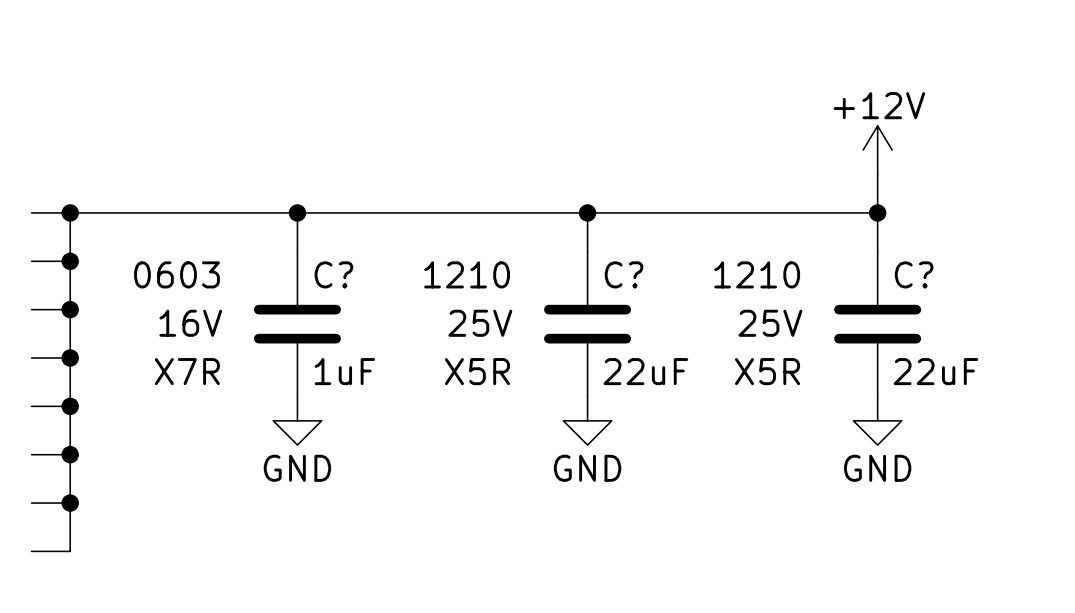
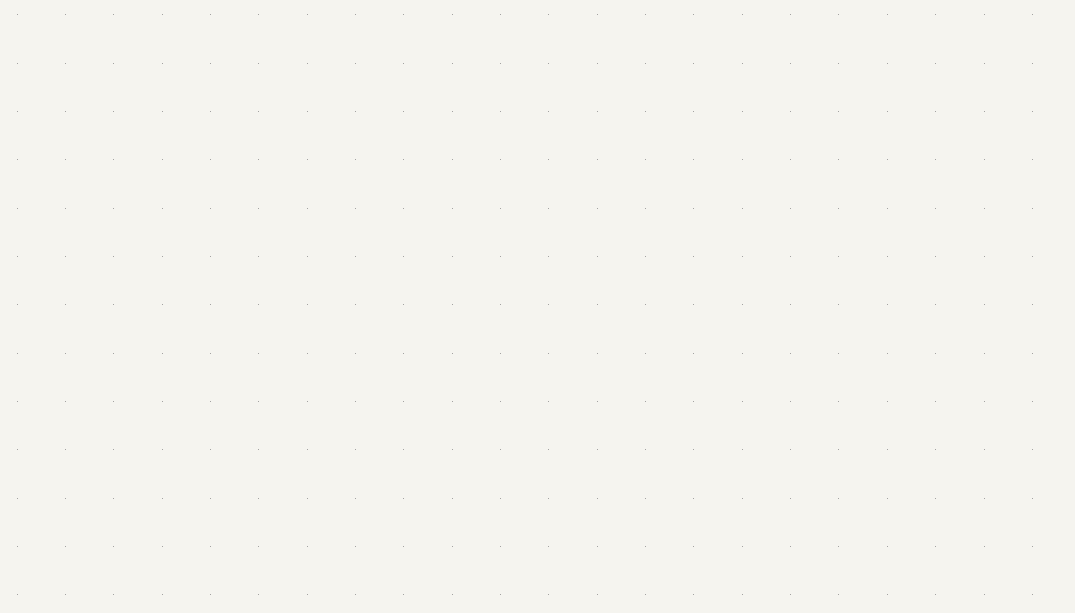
power symbol: +12V (877, 150) -> none
wire: (877, 174) (877, 251) -> none
wire: (31, 212) (877, 212) -> none
wire: (70, 212) (70, 551) (31, 551) -> none
junction: (70, 212) -> none
wire: (297, 212) (297, 251) -> none
junction: (297, 212) -> none
wire: (587, 212) (587, 251) -> none
junction: (587, 212) -> none
junction: (877, 212) -> none
wire: (31, 261) (70, 261) -> none
junction: (70, 261) -> none
wire: (31, 309) (70, 309) -> none
junction: (70, 309) -> none
C?: 1uF (297, 324) -> none
C?: 22uF (587, 324) -> none
C?: 22uF (877, 324) -> none
wire: (31, 358) (70, 358) -> none
junction: (70, 358) -> none
wire: (31, 406) (70, 406) -> none
junction: (70, 406) -> none
power symbol: GND (297, 420) -> none
power symbol: GND (587, 420) -> none
power symbol: GND (877, 420) -> none
wire: (31, 454) (70, 454) -> none
junction: (70, 454) -> none
wire: (31, 503) (70, 503) -> none
junction: (70, 503) -> none

